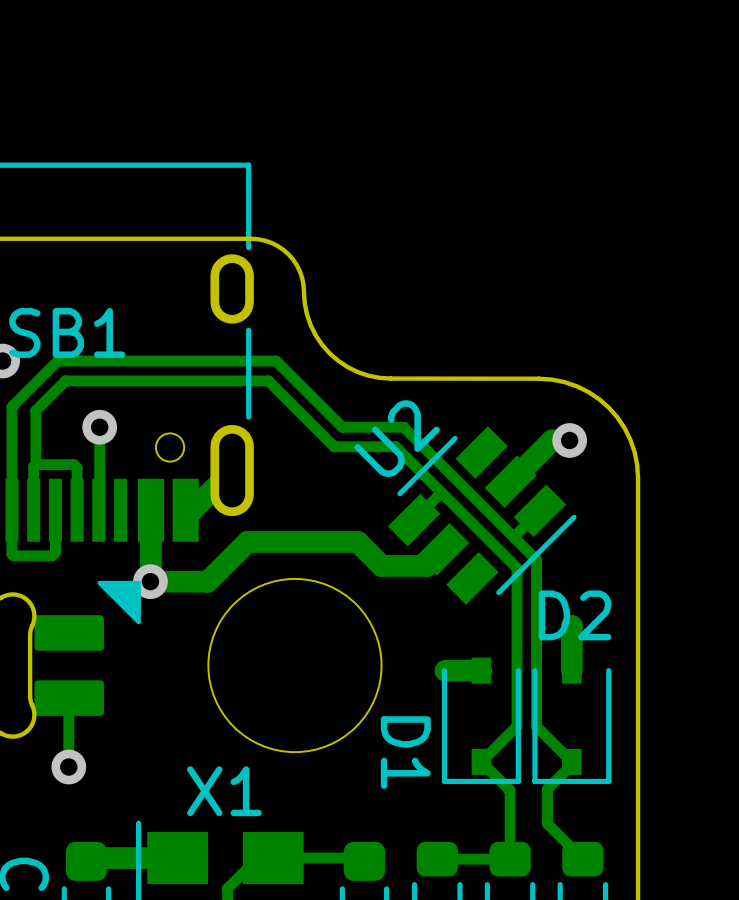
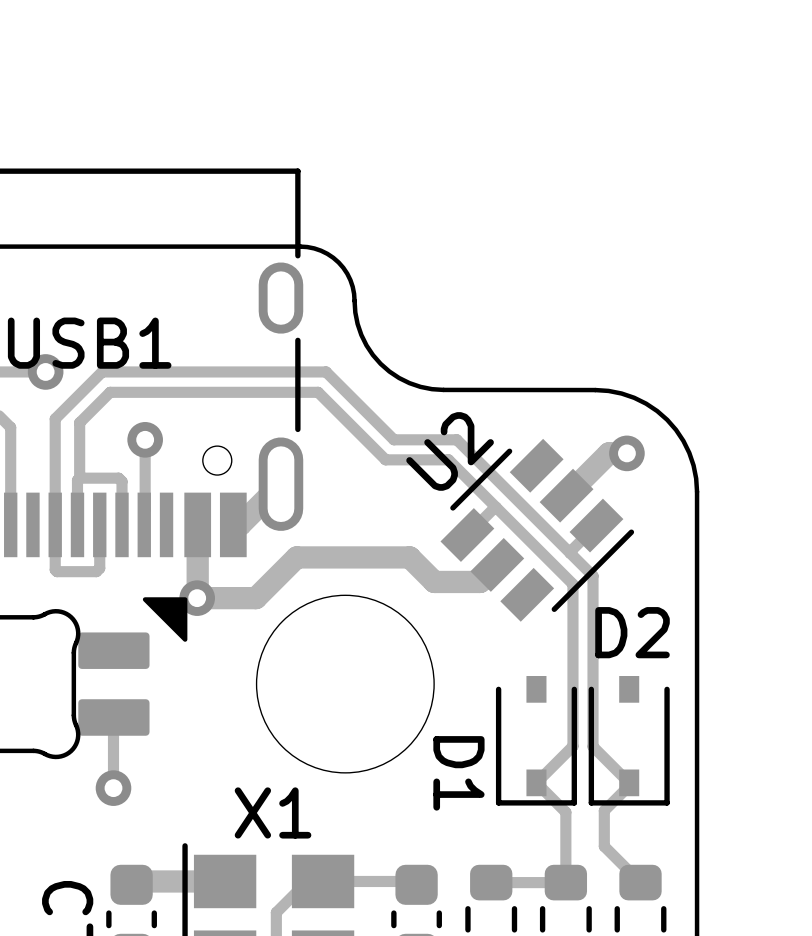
track: (571, 625) (571, 670) -> none
track: (481, 670) (445, 670) -> none

